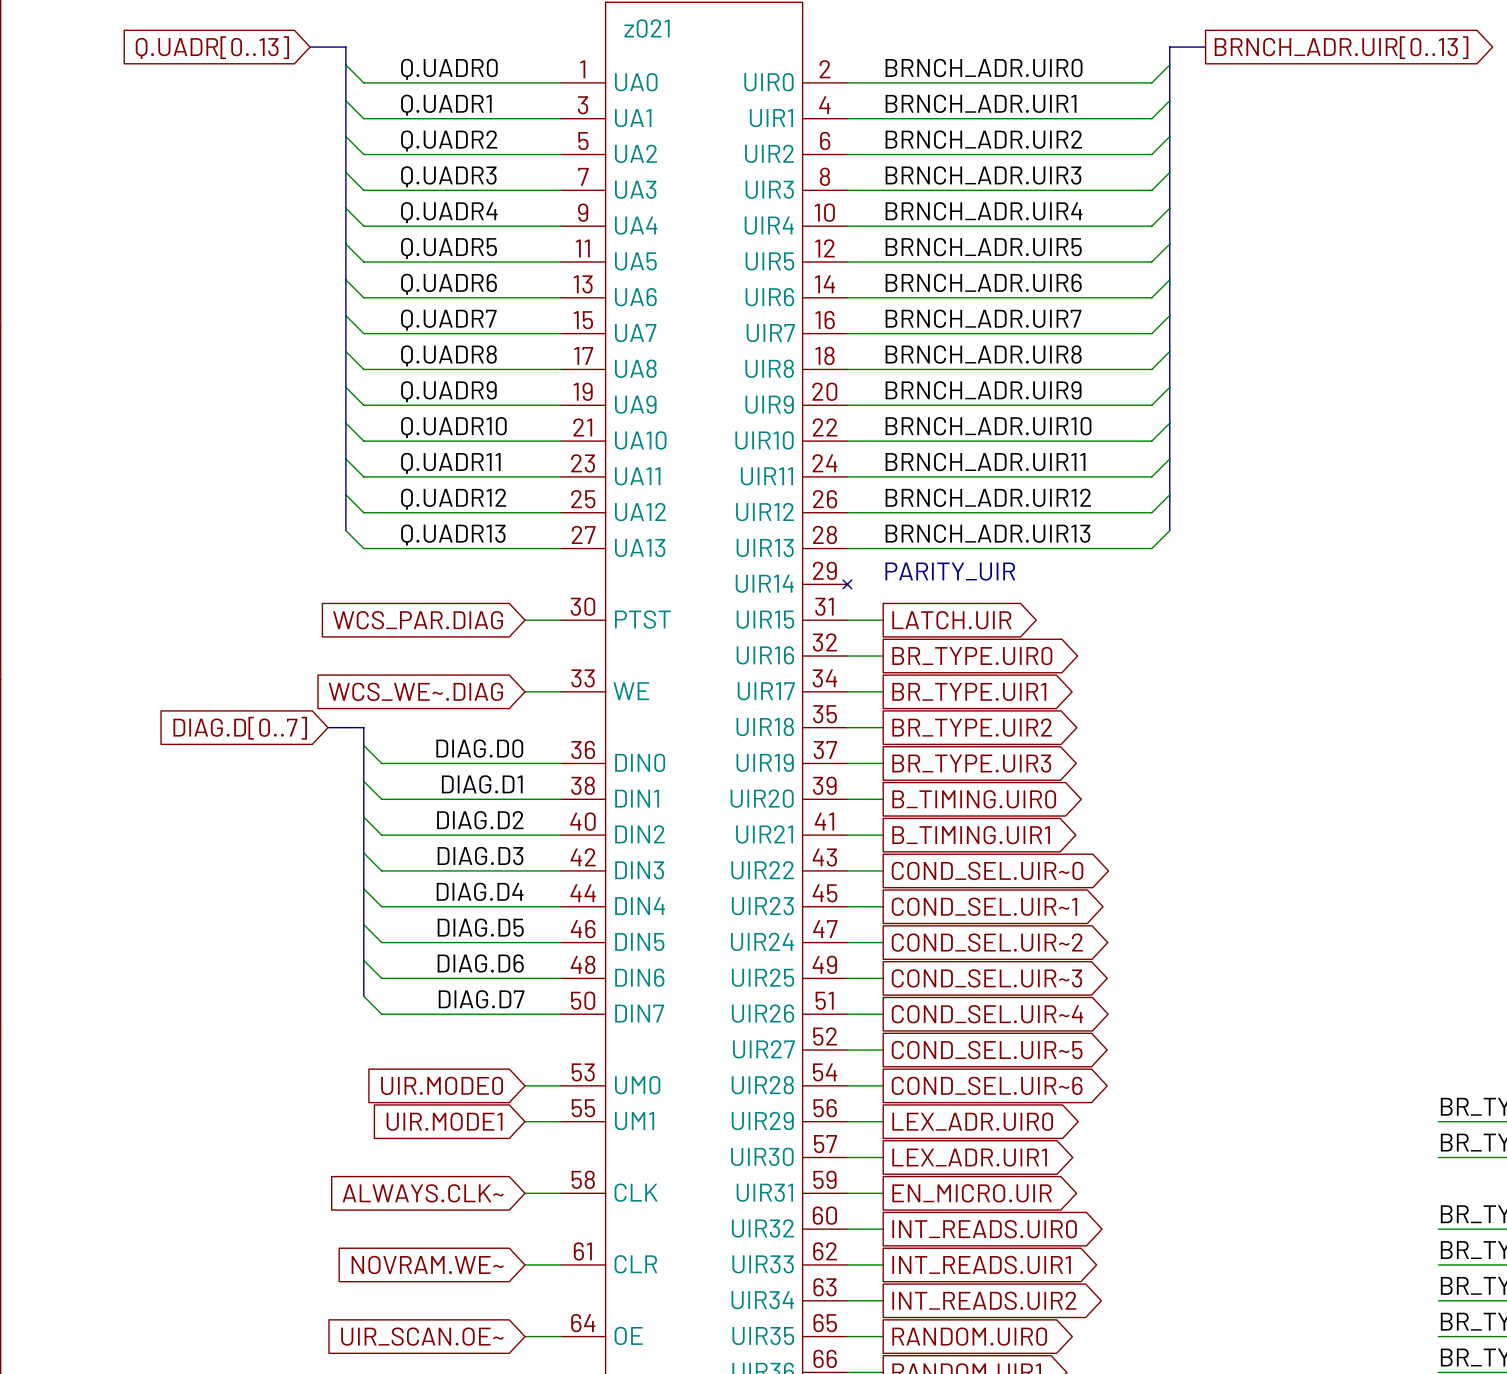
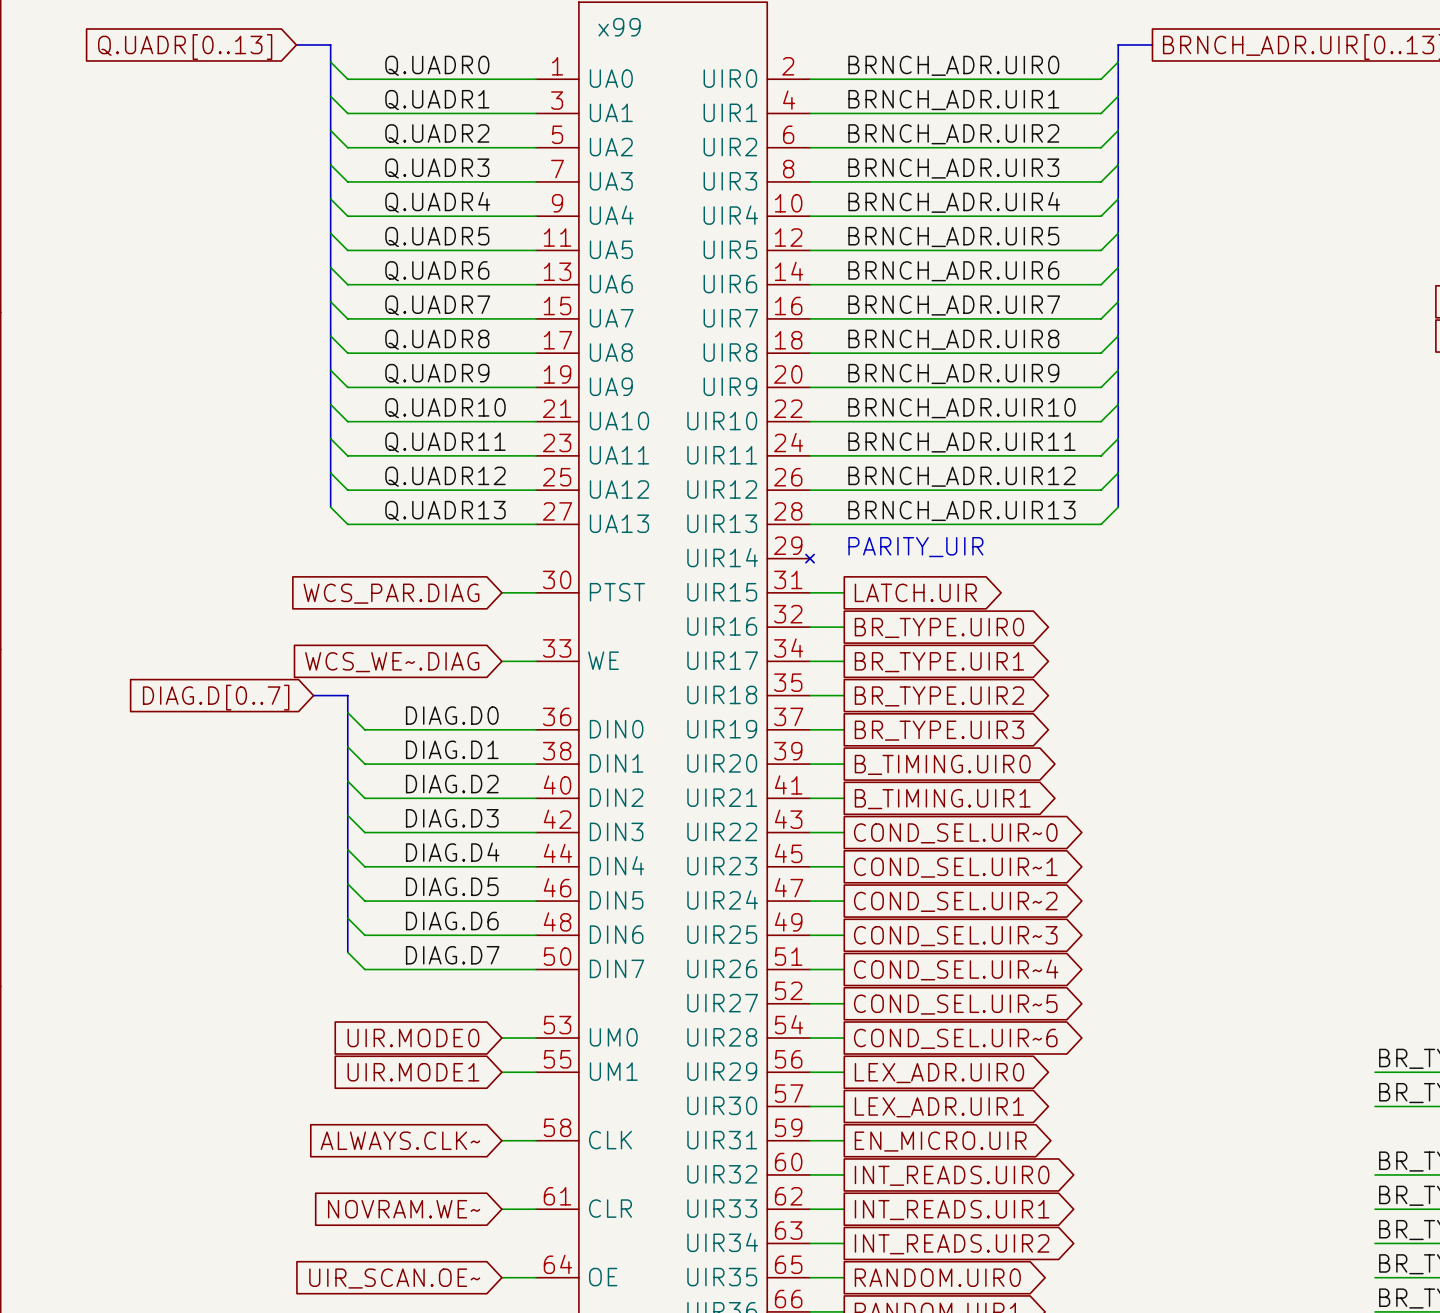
part text: z021 (647, 28) -> x99 (619, 27)

